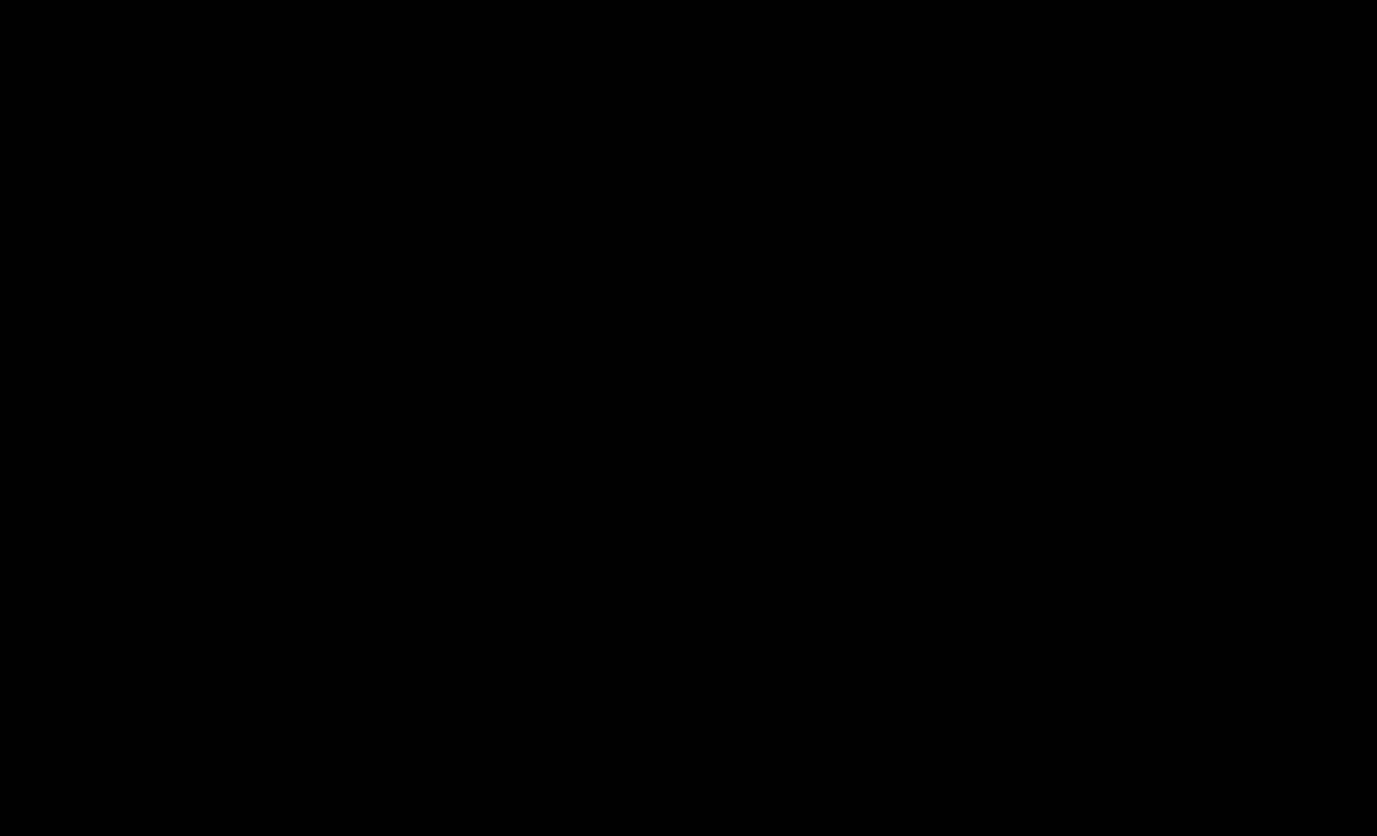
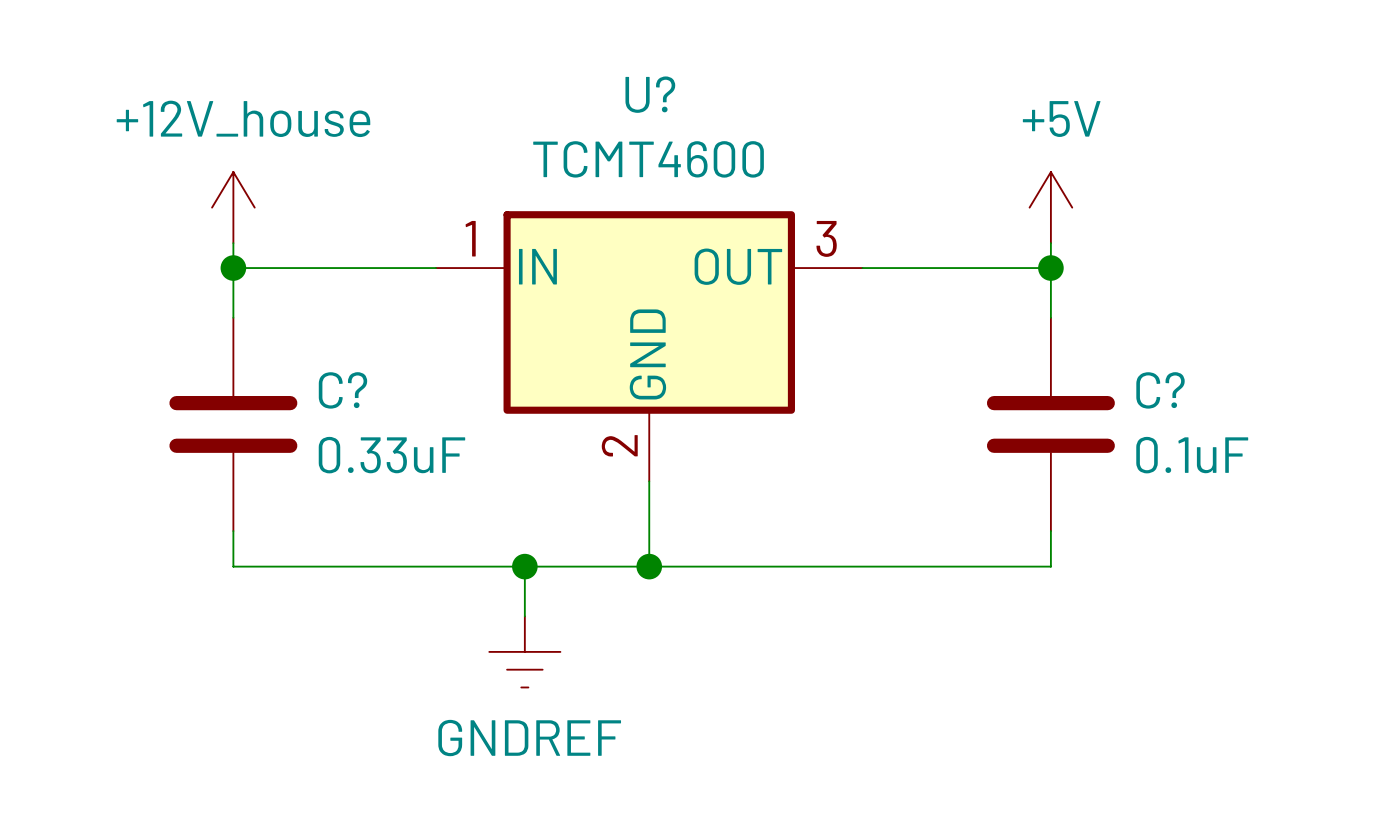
power symbol: none -> +12V_house (233, 207)
power symbol: none -> +5V (1050, 207)
wire: none -> (233, 243) (233, 317)
wire: none -> (1050, 243) (1050, 317)
wire: none -> (233, 268) (435, 268)
junction: none -> (233, 268)
wire: none -> (862, 268) (1050, 268)
junction: none -> (1050, 268)
U?: none -> TCMT4600 (649, 346)
C?: none -> 0.33uF (233, 424)
C?: none -> 0.1uF (1050, 424)
wire: none -> (649, 481) (649, 566)
wire: none -> (233, 531) (233, 566) (1050, 566) (1050, 531)
wire: none -> (524, 566) (524, 616)
junction: none -> (524, 566)
junction: none -> (649, 566)
power symbol: none -> GNDREF (524, 651)

